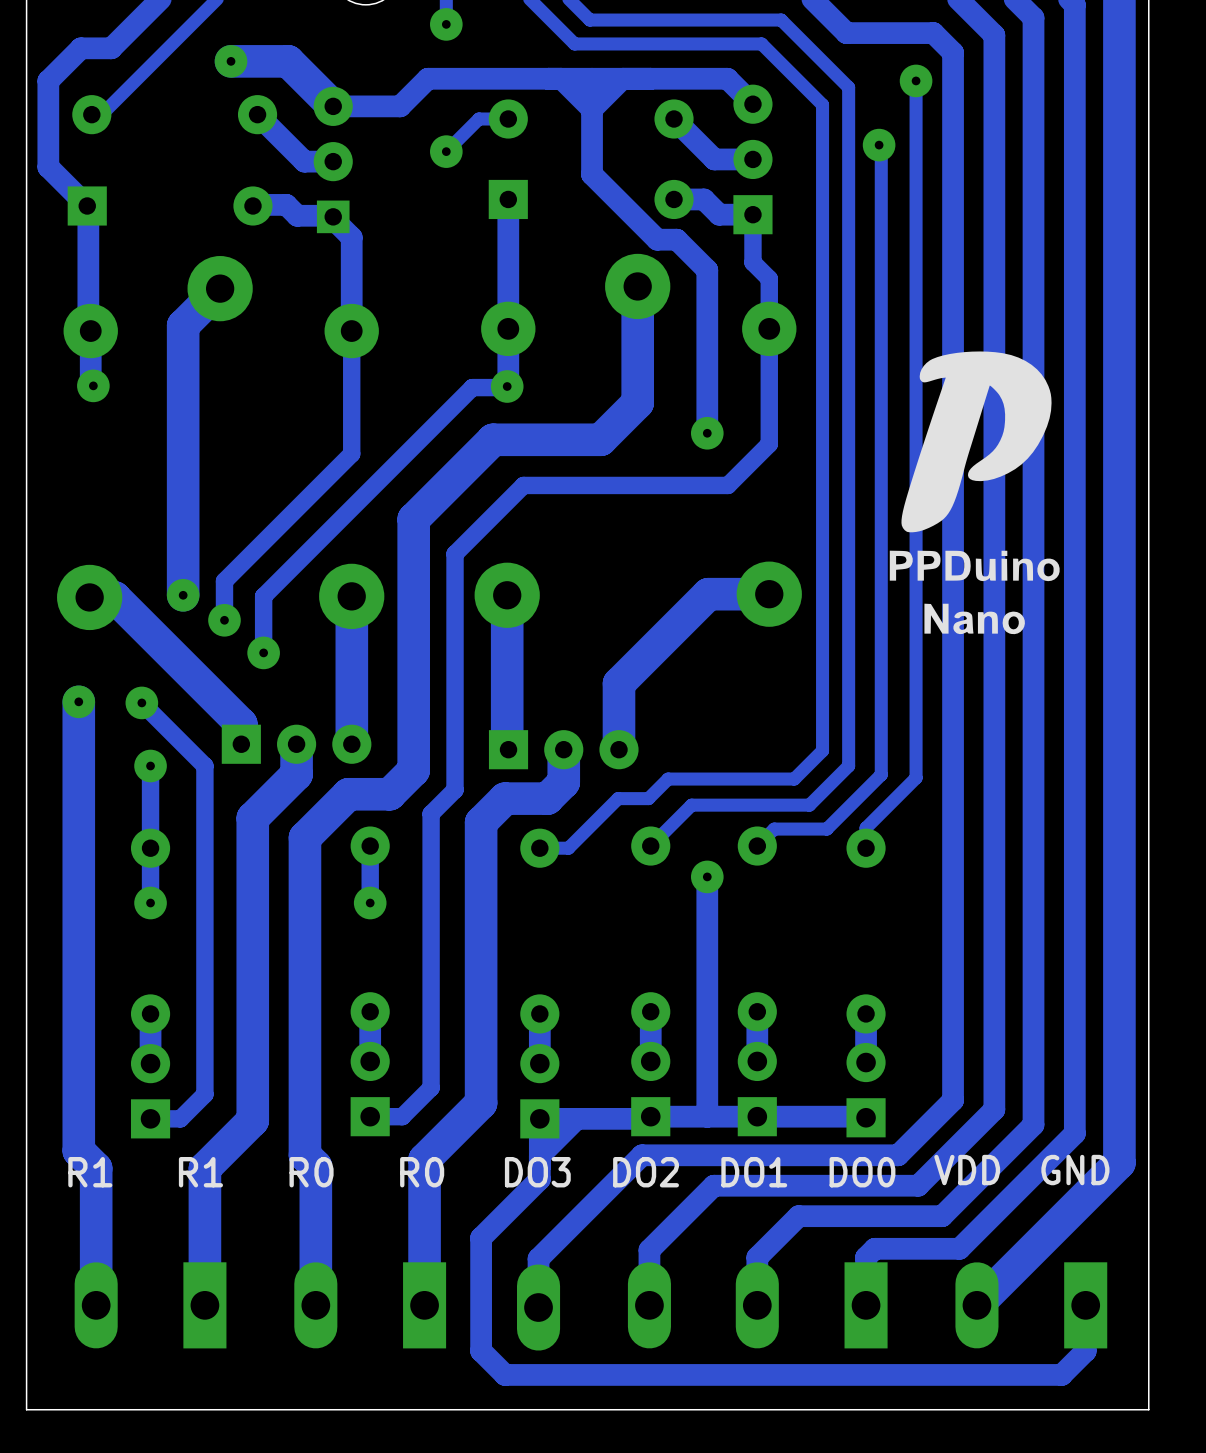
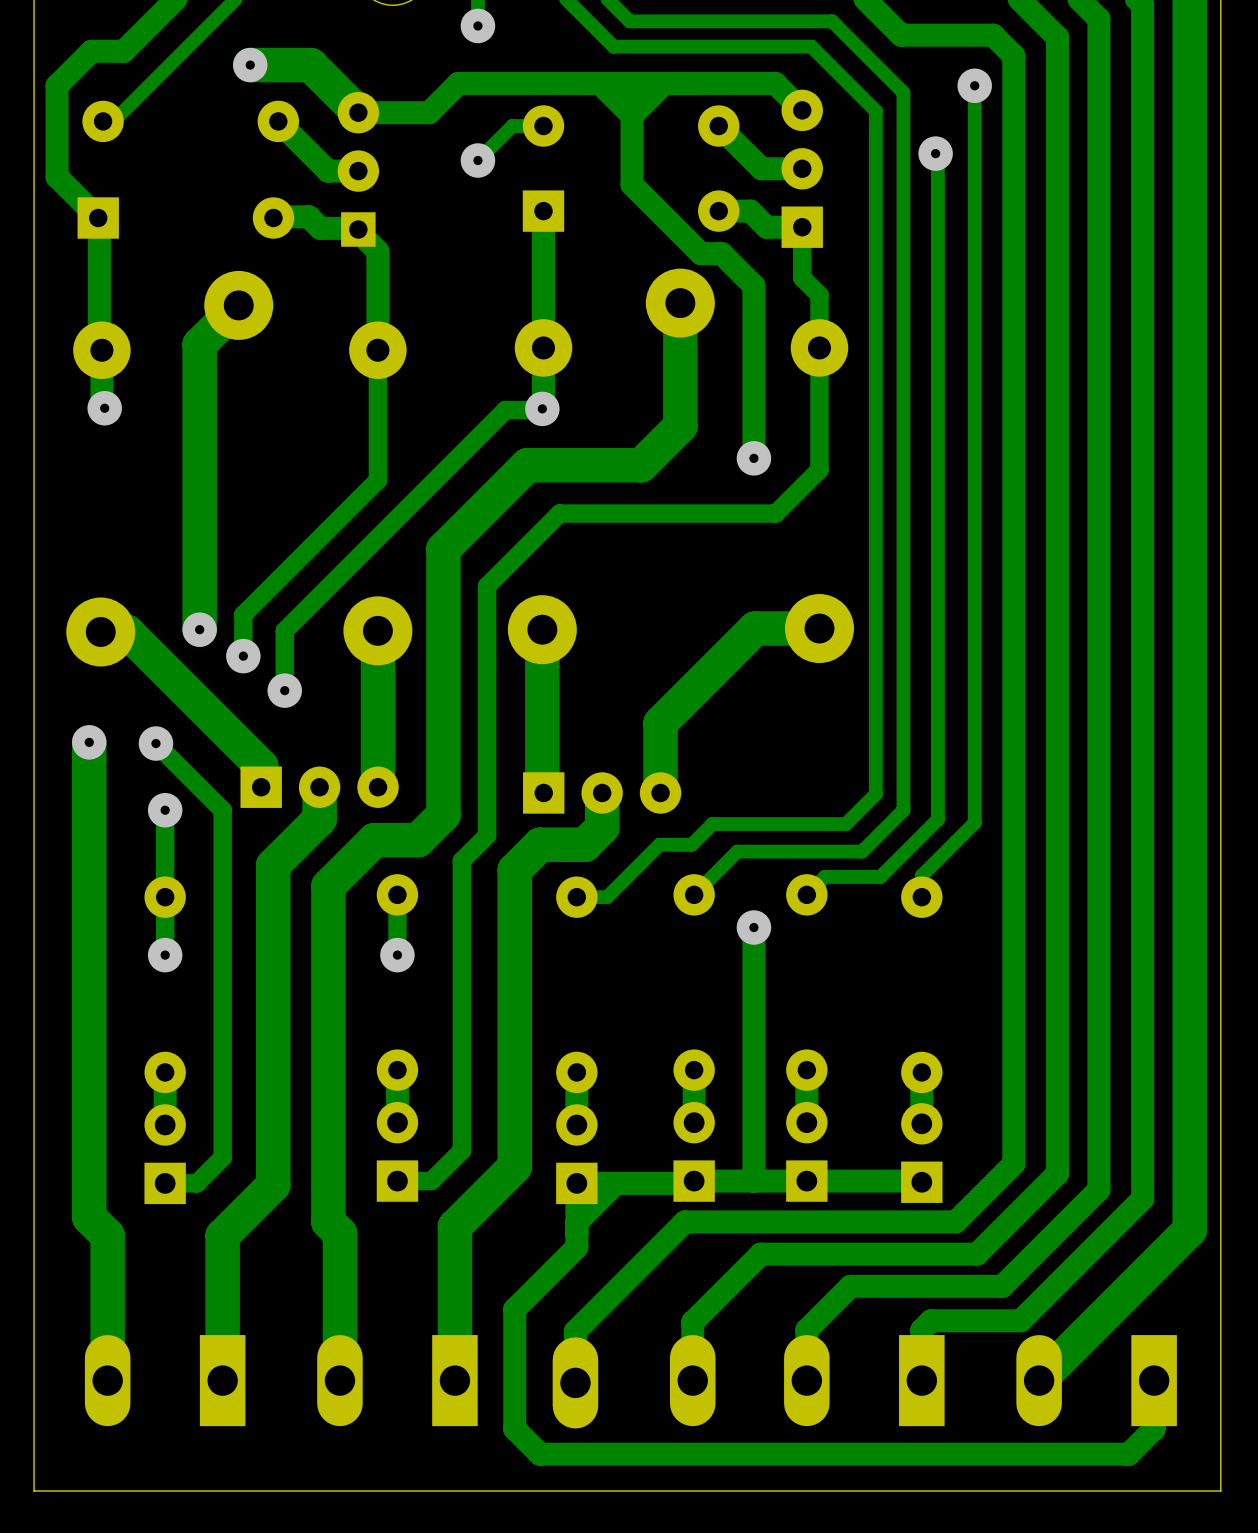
drawing: [889, 351, 1060, 635] -> none
text: VDD GND (1021, 1170) -> none
text: R1 R1 R0 R0 (256, 1172) -> none
text: DO3 DO2 DO1 DO0 (700, 1172) -> none

